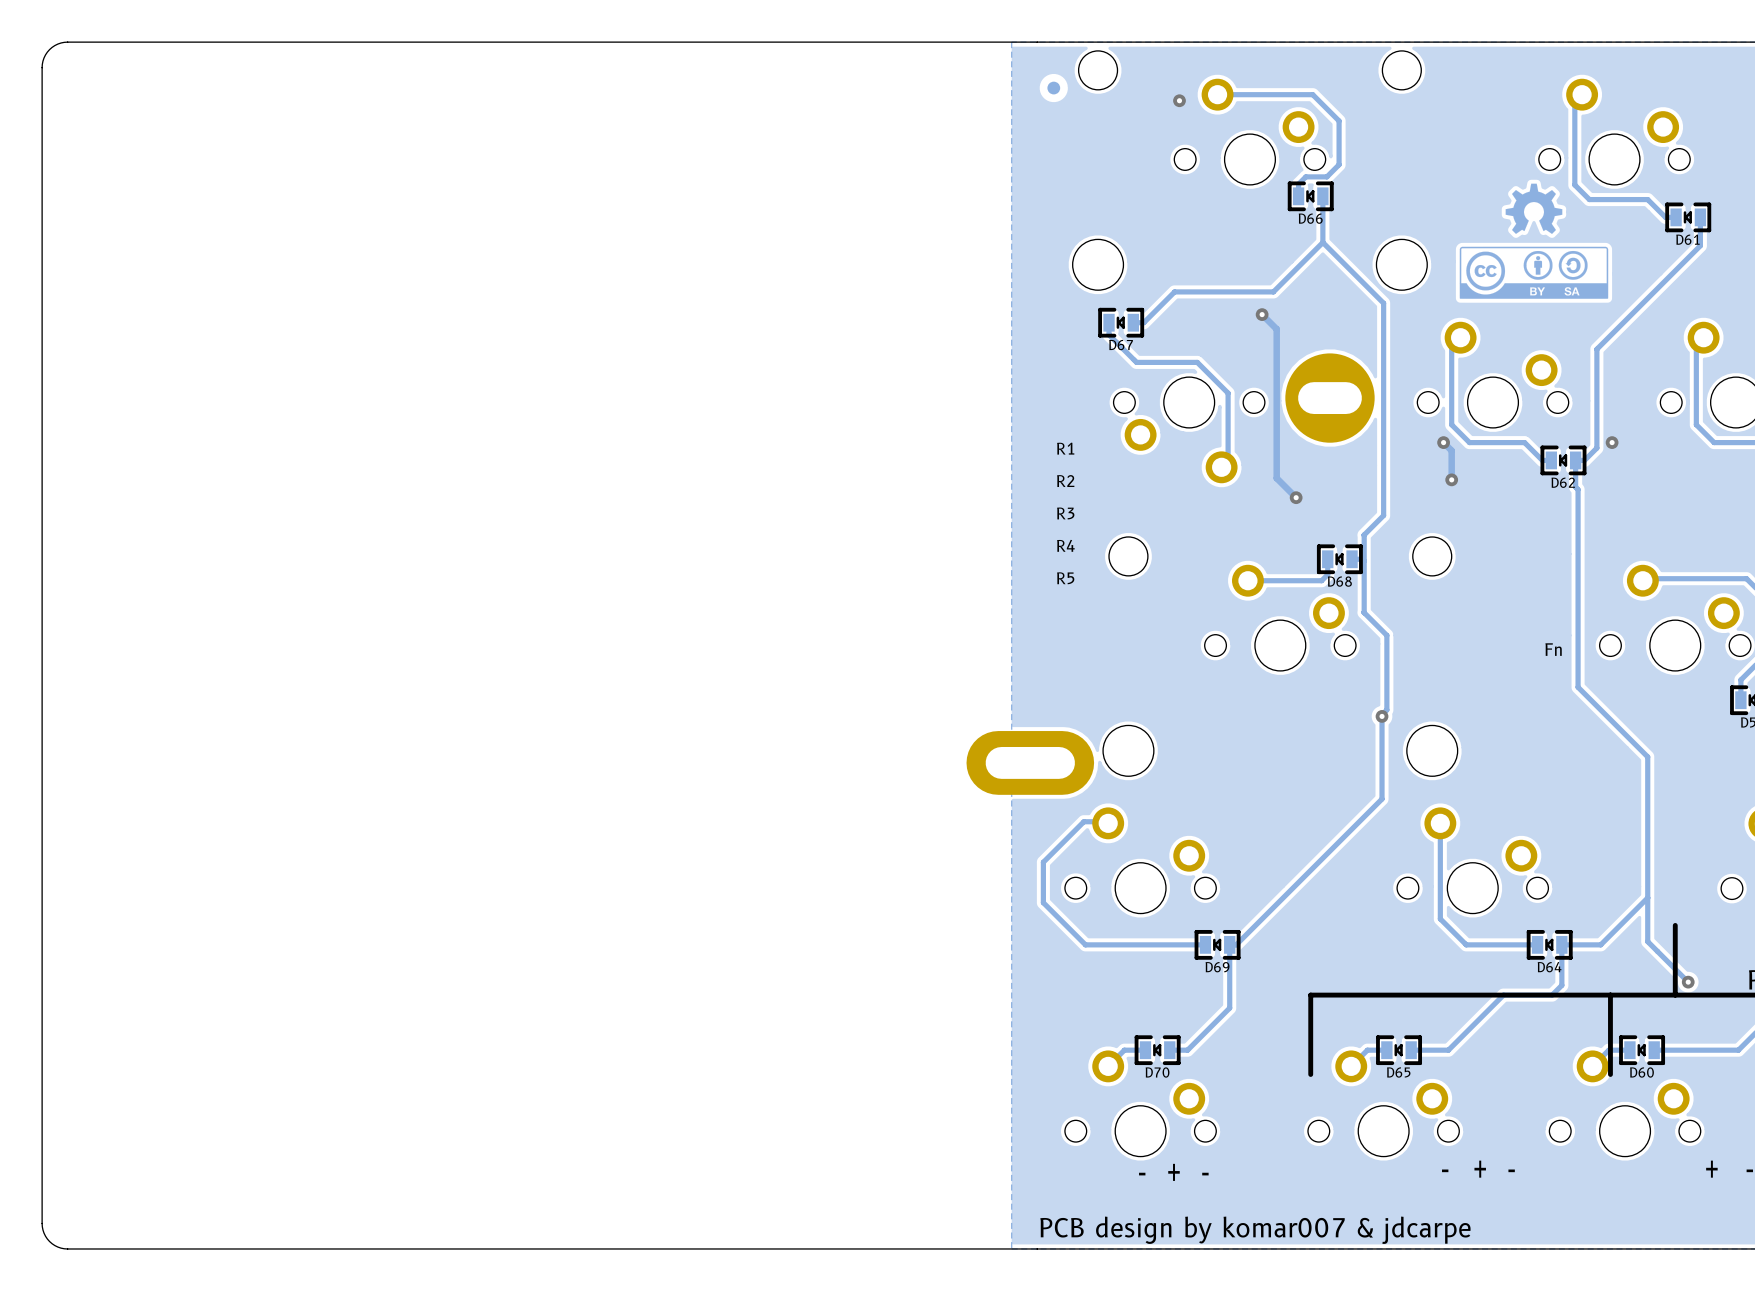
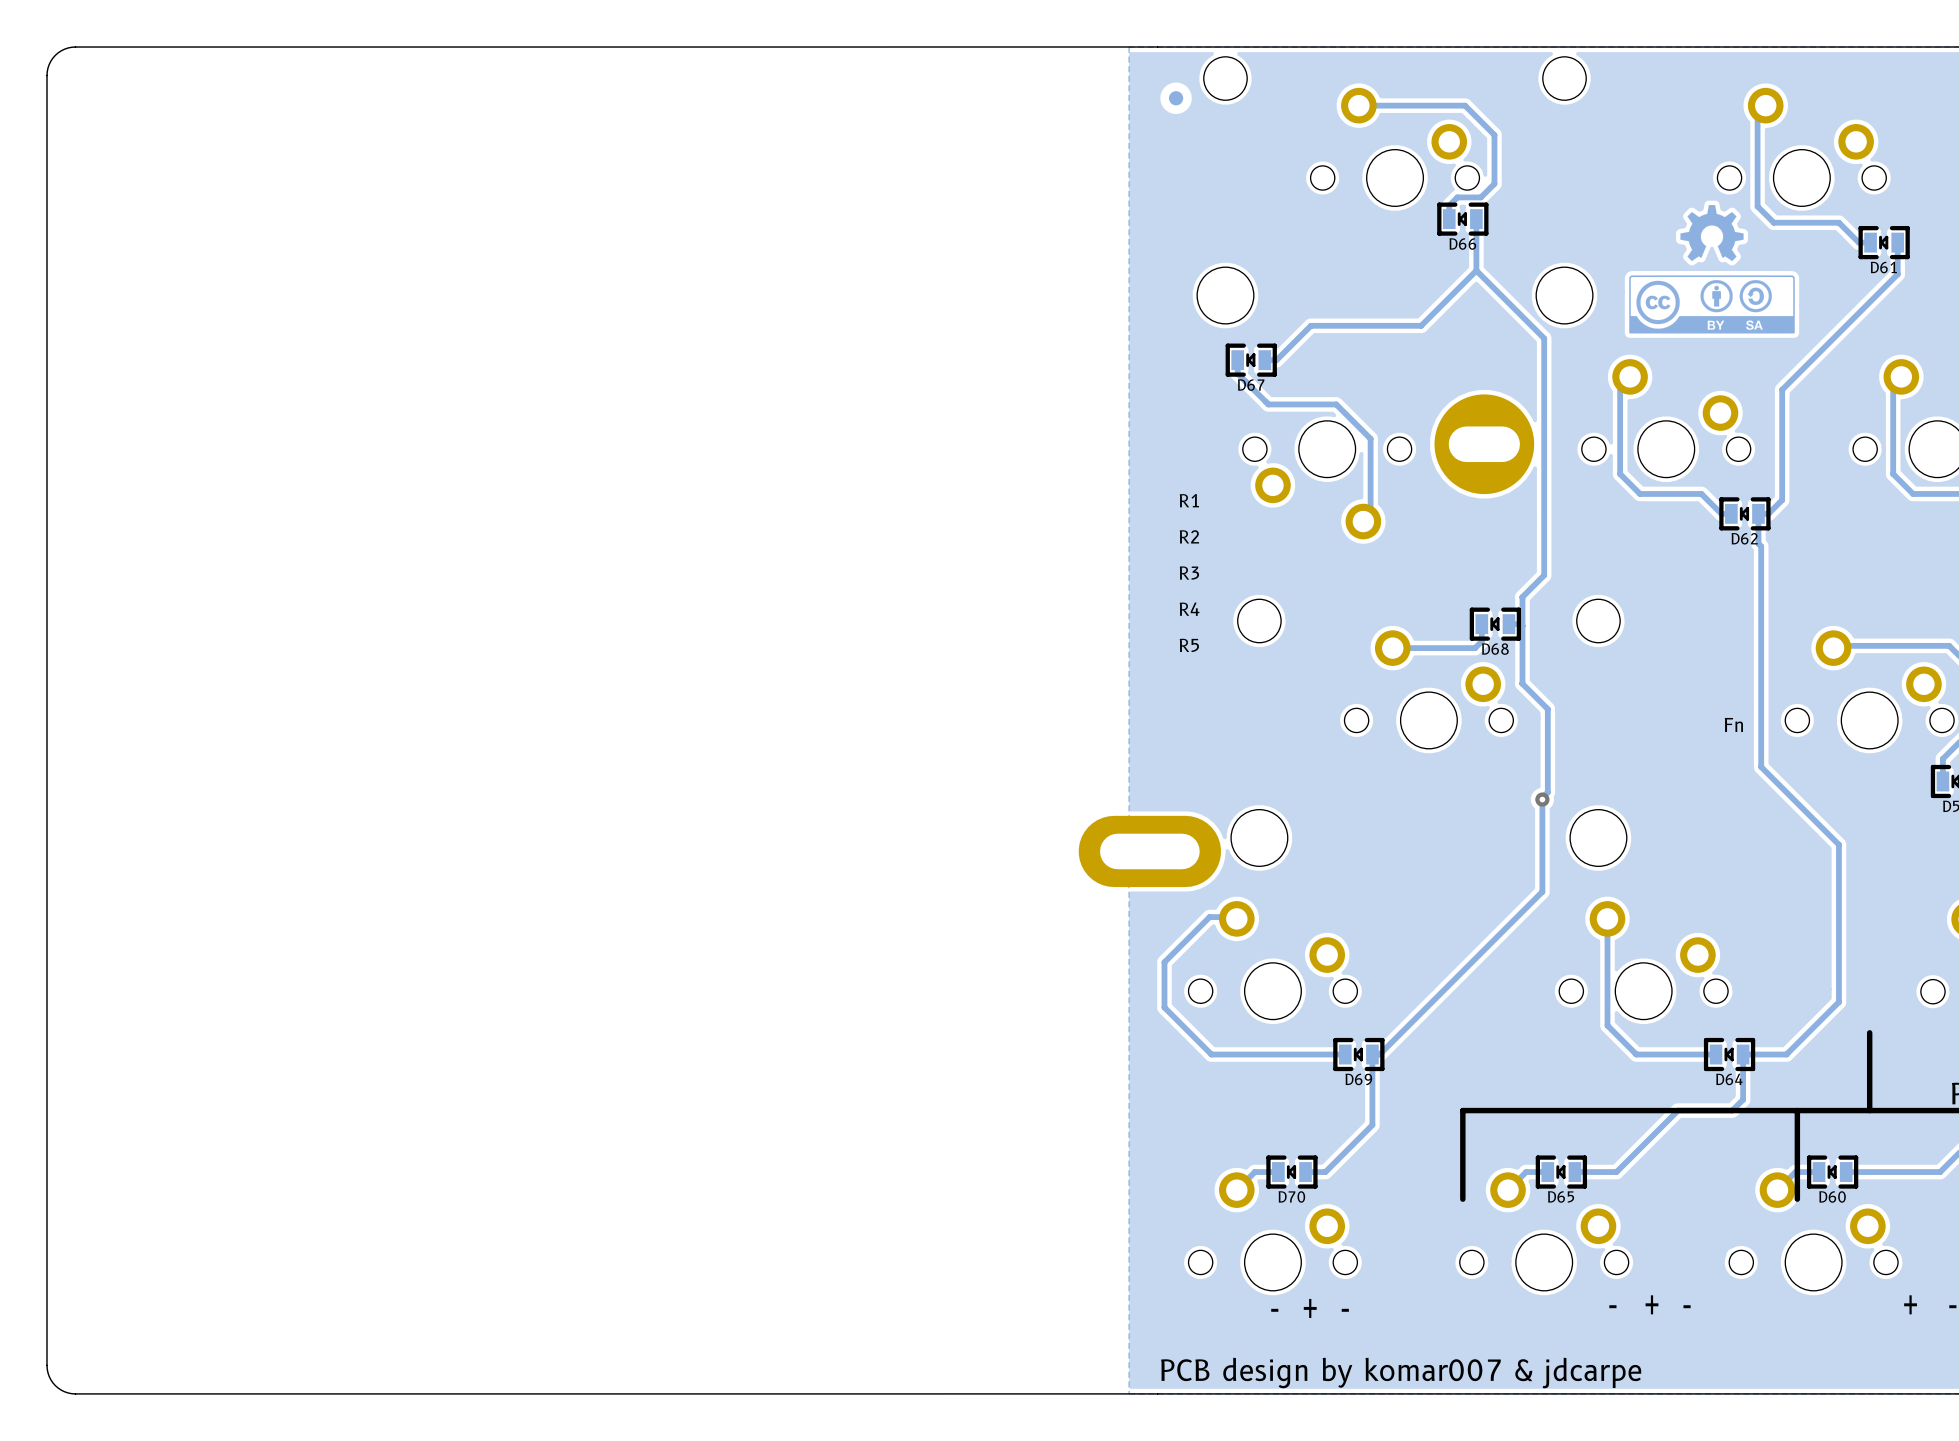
via: (1179, 100) -> none
track: (1262, 314) (1276, 329) (1276, 478) (1296, 497) -> none
via: (1262, 314) -> none
track: (1443, 442) (1451, 450) (1451, 479) -> none
via: (1443, 442) -> none
via: (1612, 442) -> none
via: (1451, 479) -> none
via: (1296, 497) -> none
track: (1647, 897) (1647, 941) (1688, 982) -> none
via: (1688, 982) -> none

